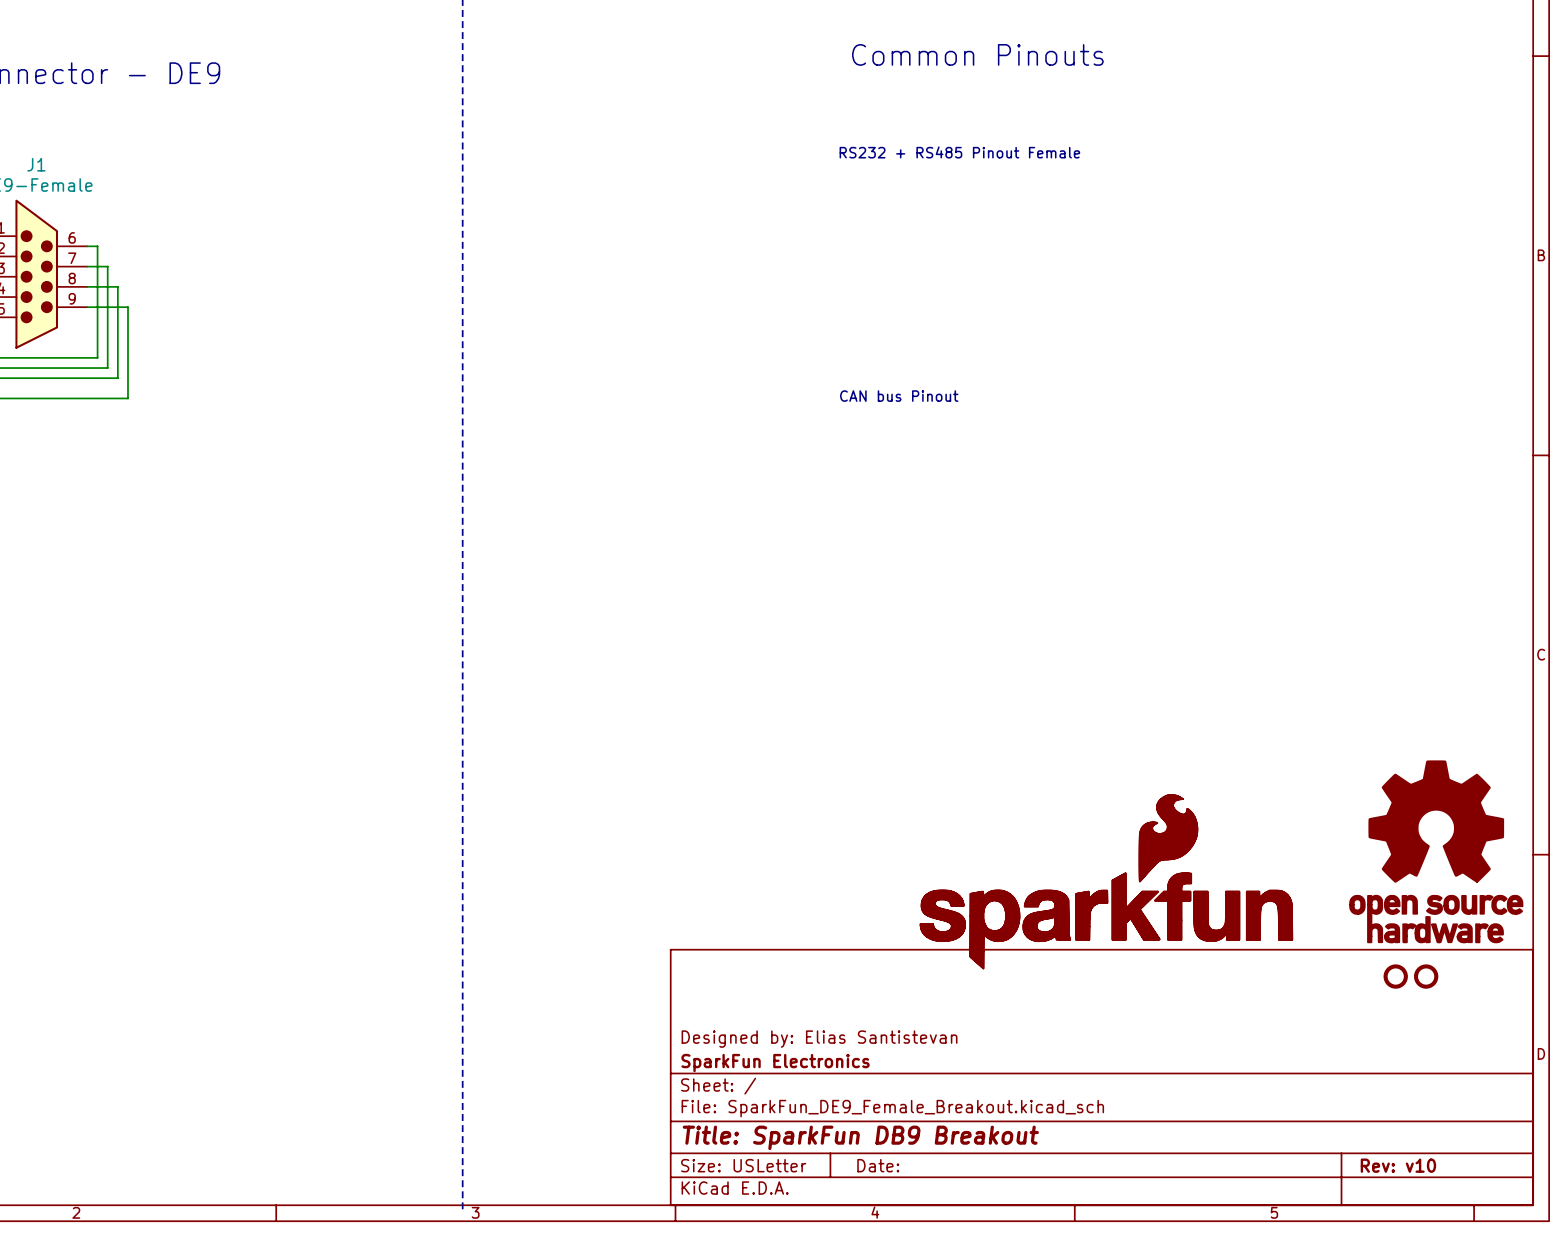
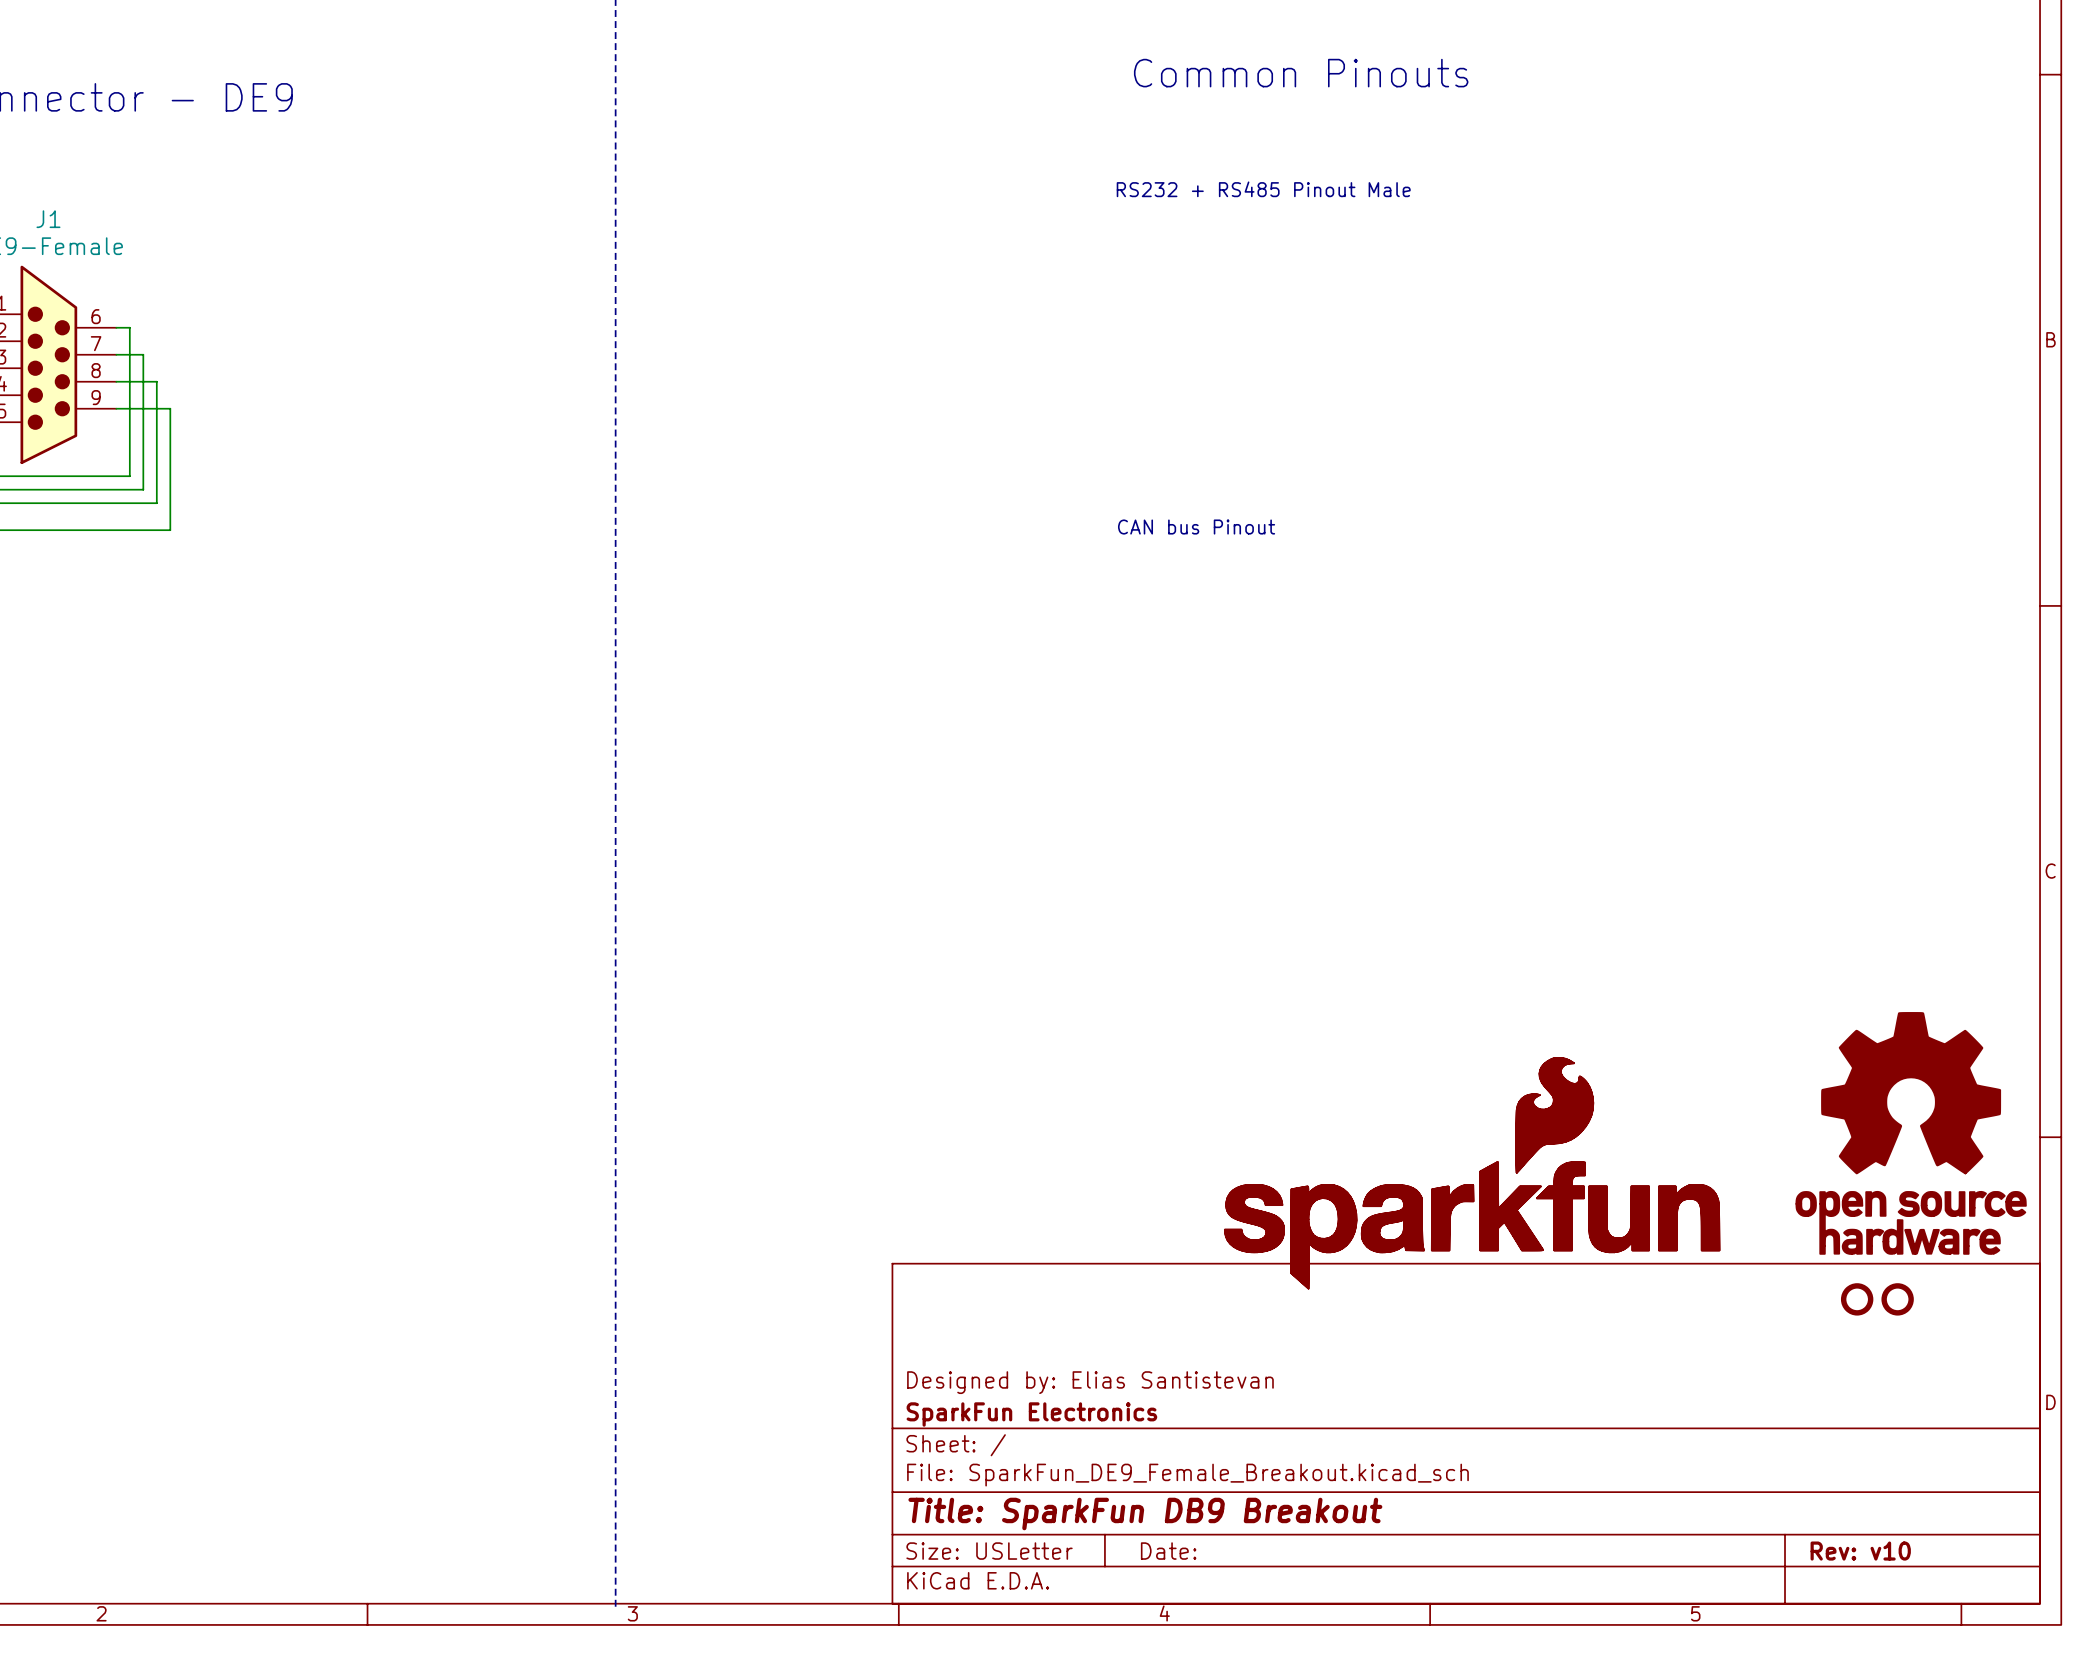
text: RS232 + RS485 Pinout Female (959, 152) -> RS232 + RS485 Pinout Male (1263, 189)

